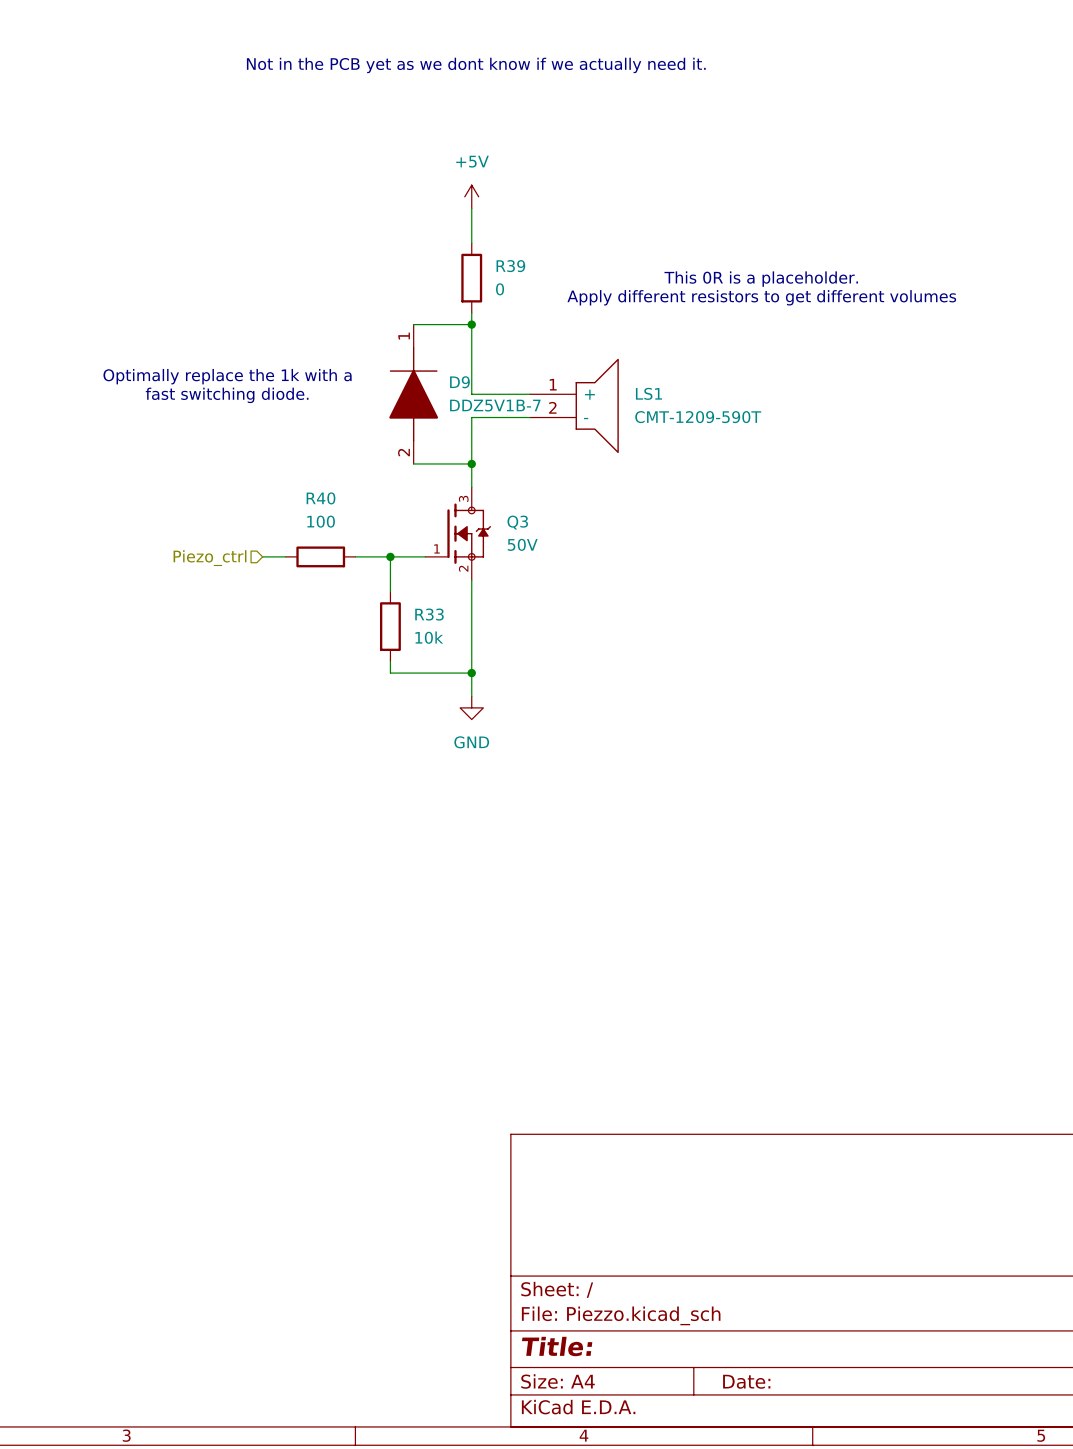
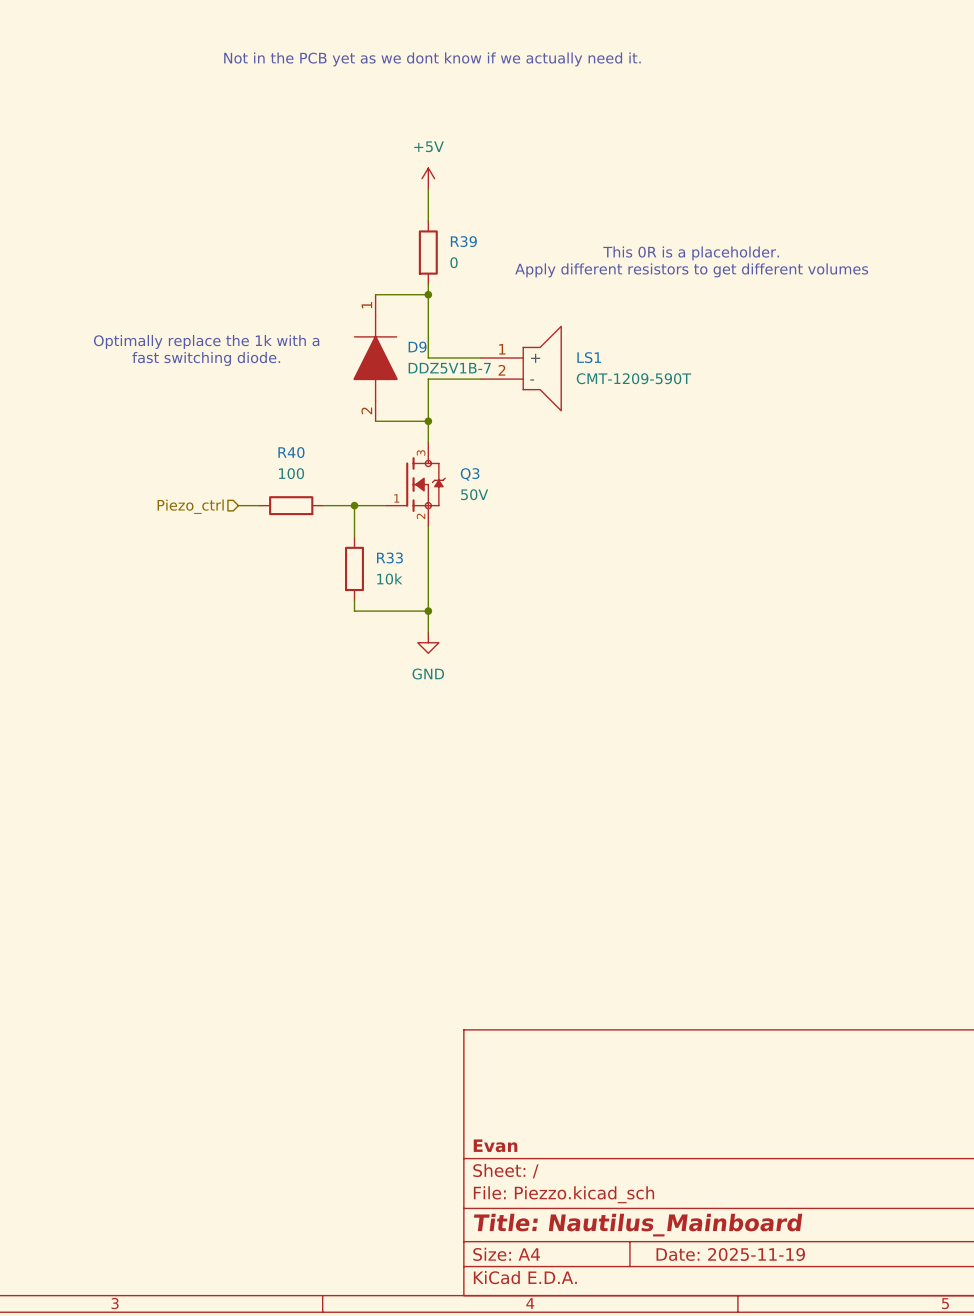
title block: none -> Evan (495, 1145)
title block: Title: (557, 1346) -> Title: Nautilus_Mainboard (638, 1225)
title block: Date: (746, 1381) -> Date: 2025-11-19 (730, 1254)

